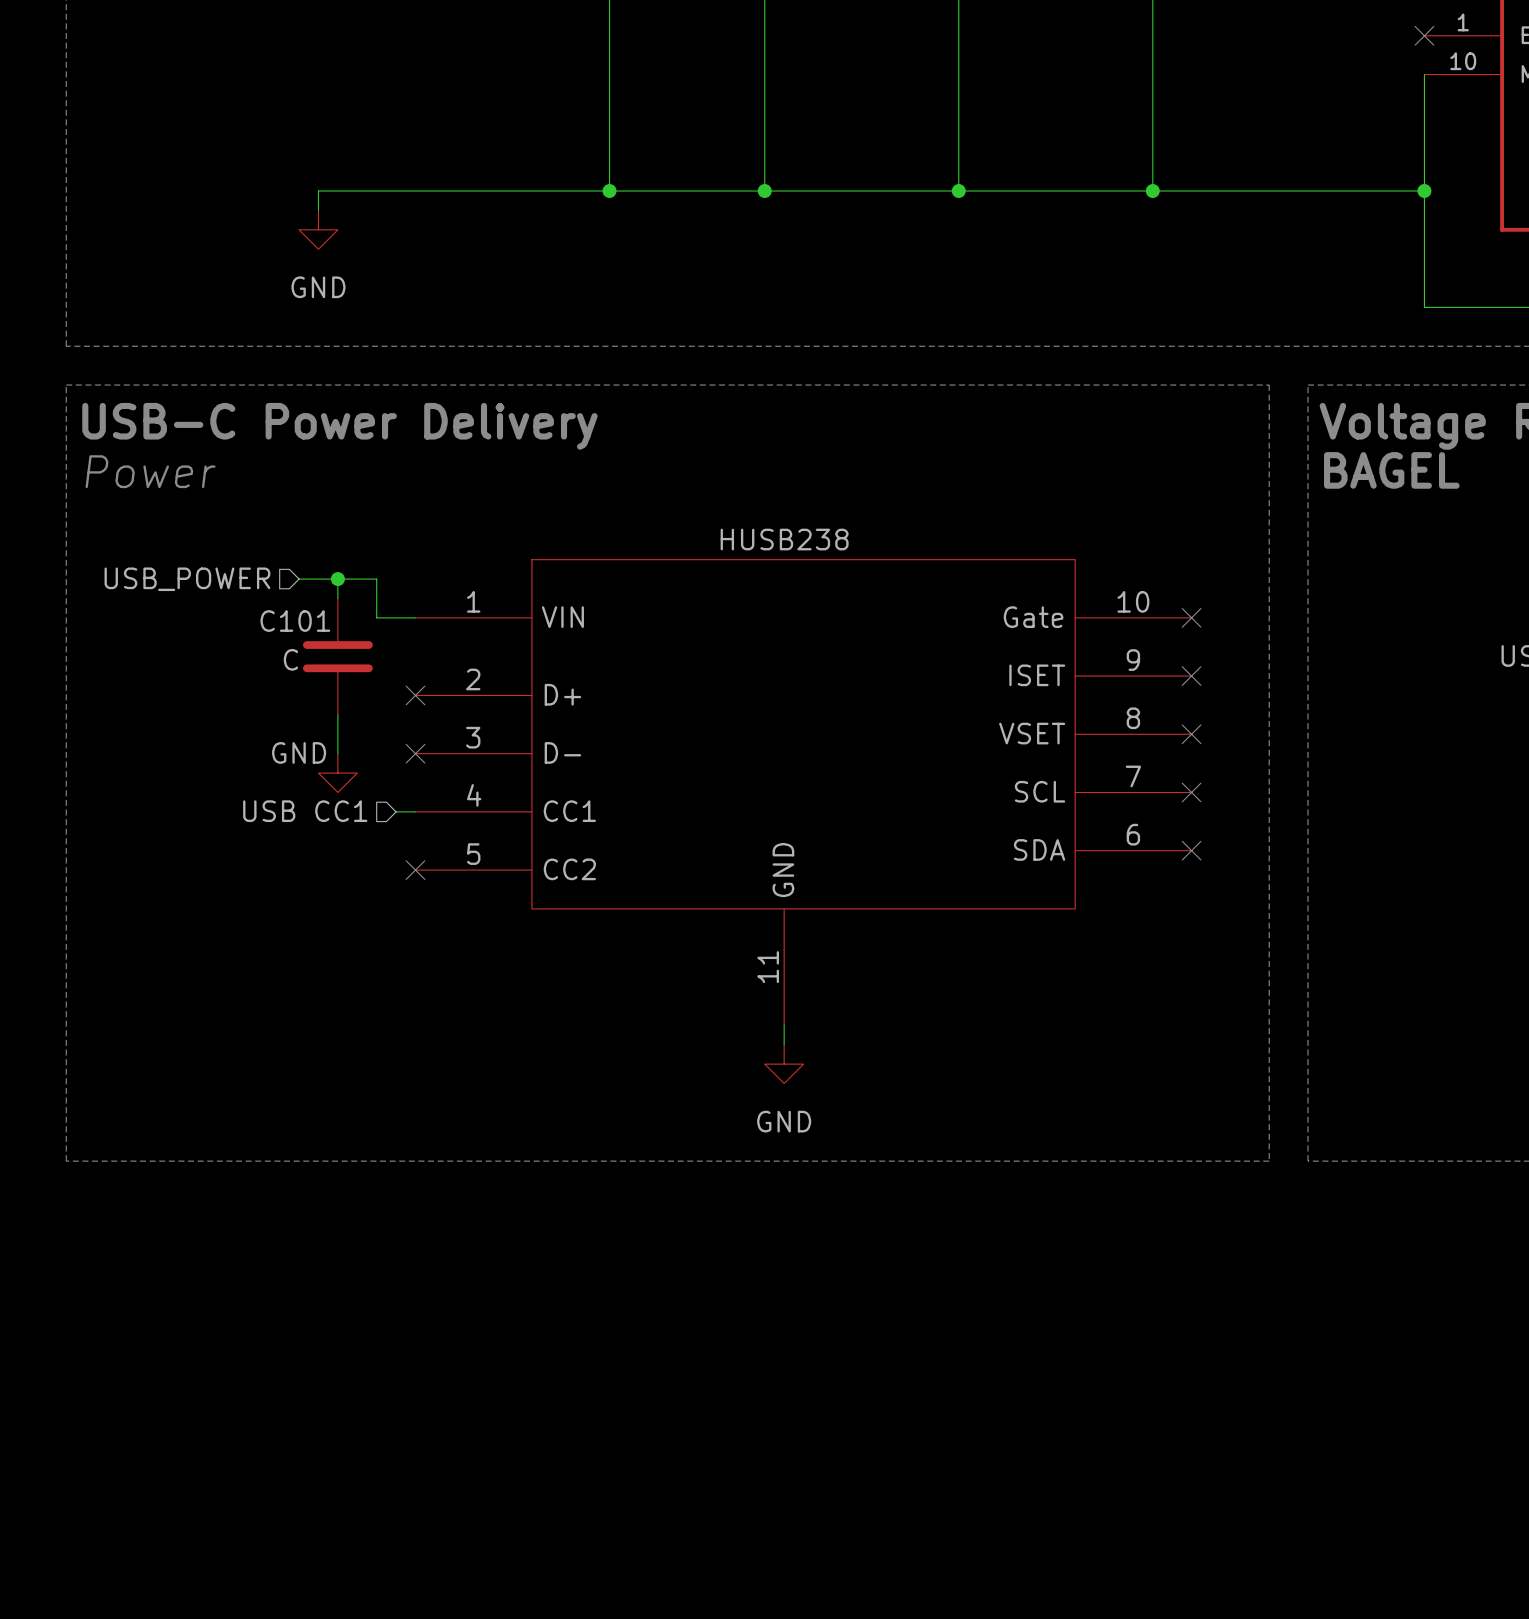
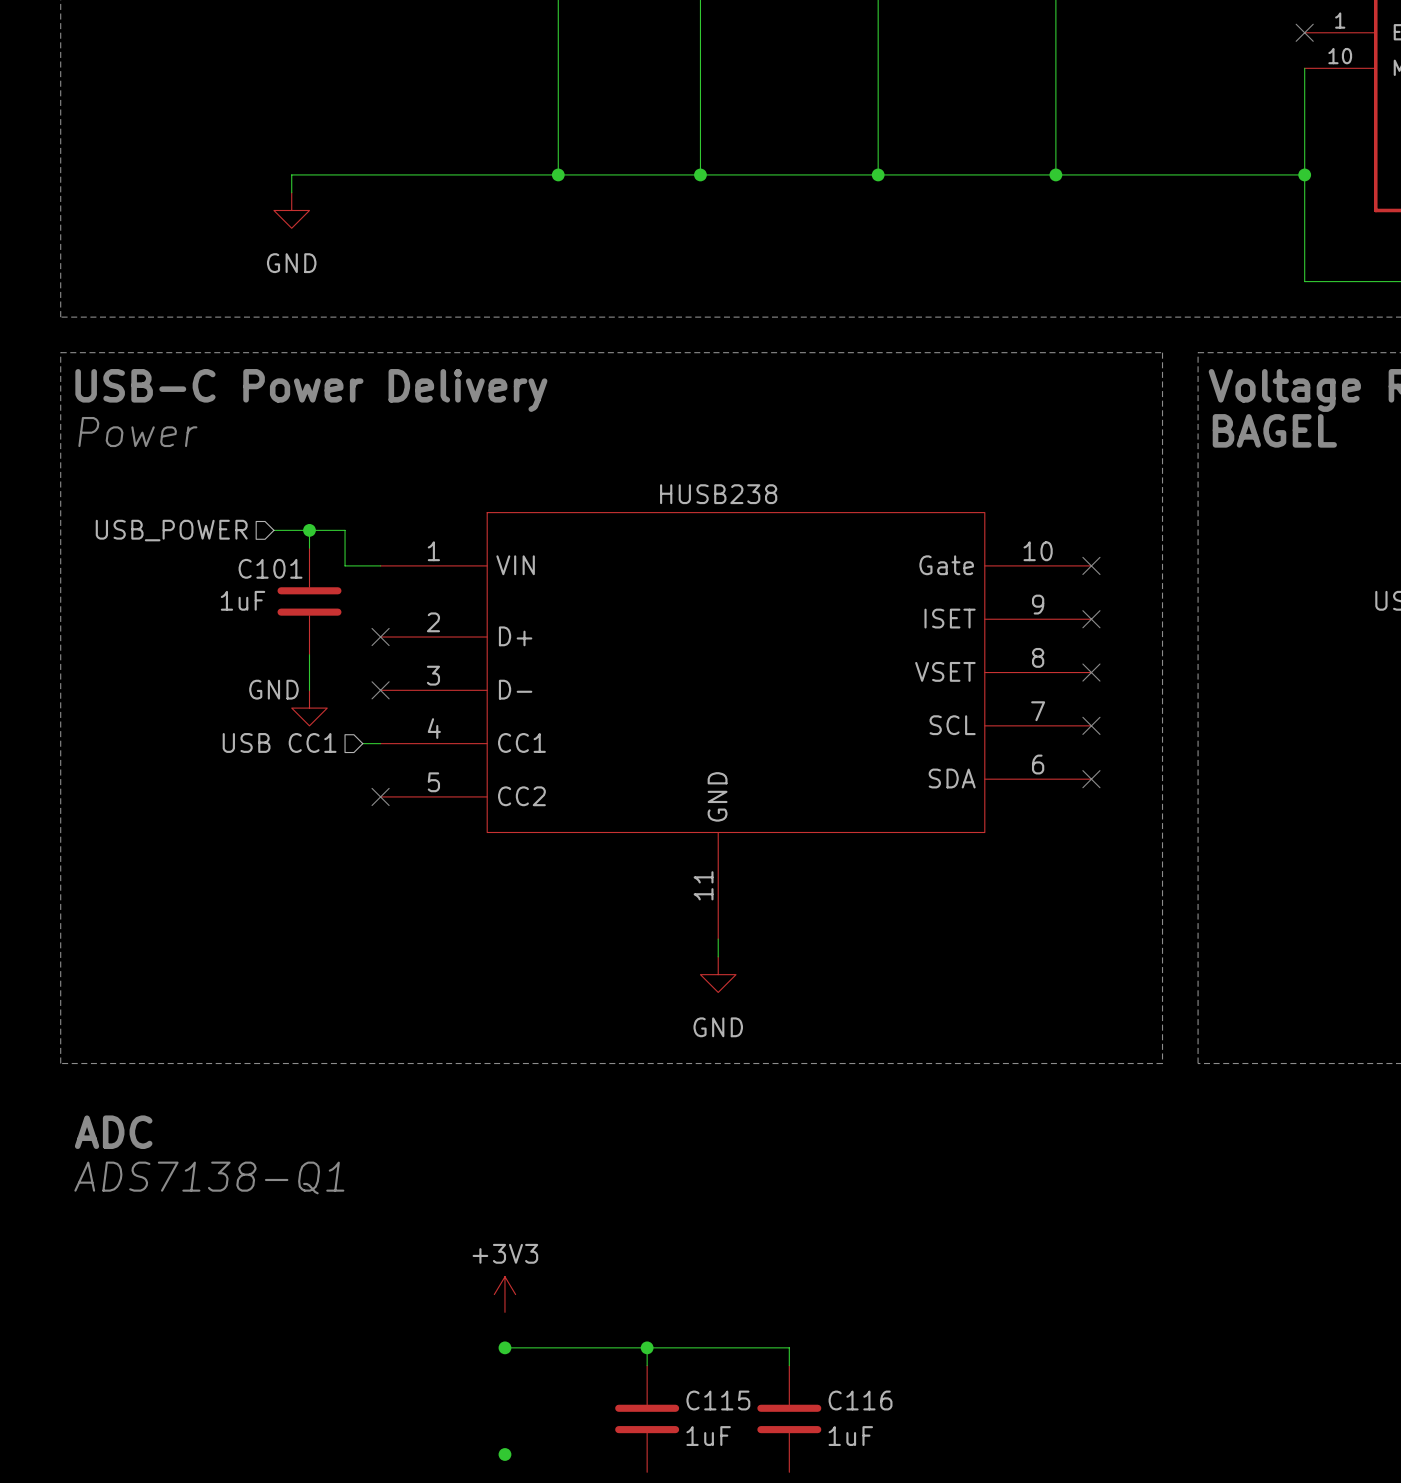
C101 value: C (290, 659) -> 1uF (243, 600)
text: none -> ADC (113, 1132)
text: none -> ADS7138-Q1 (209, 1177)
power symbol: none -> +3V3 (504, 1294)
wire: none -> (504, 1347) (789, 1347) (789, 1365)
junction: none -> (504, 1347)
wire: none -> (647, 1347) (647, 1365)
junction: none -> (647, 1347)
C115: none -> 1uF (647, 1418)
C116: none -> 1uF (789, 1418)
junction: none -> (504, 1454)

